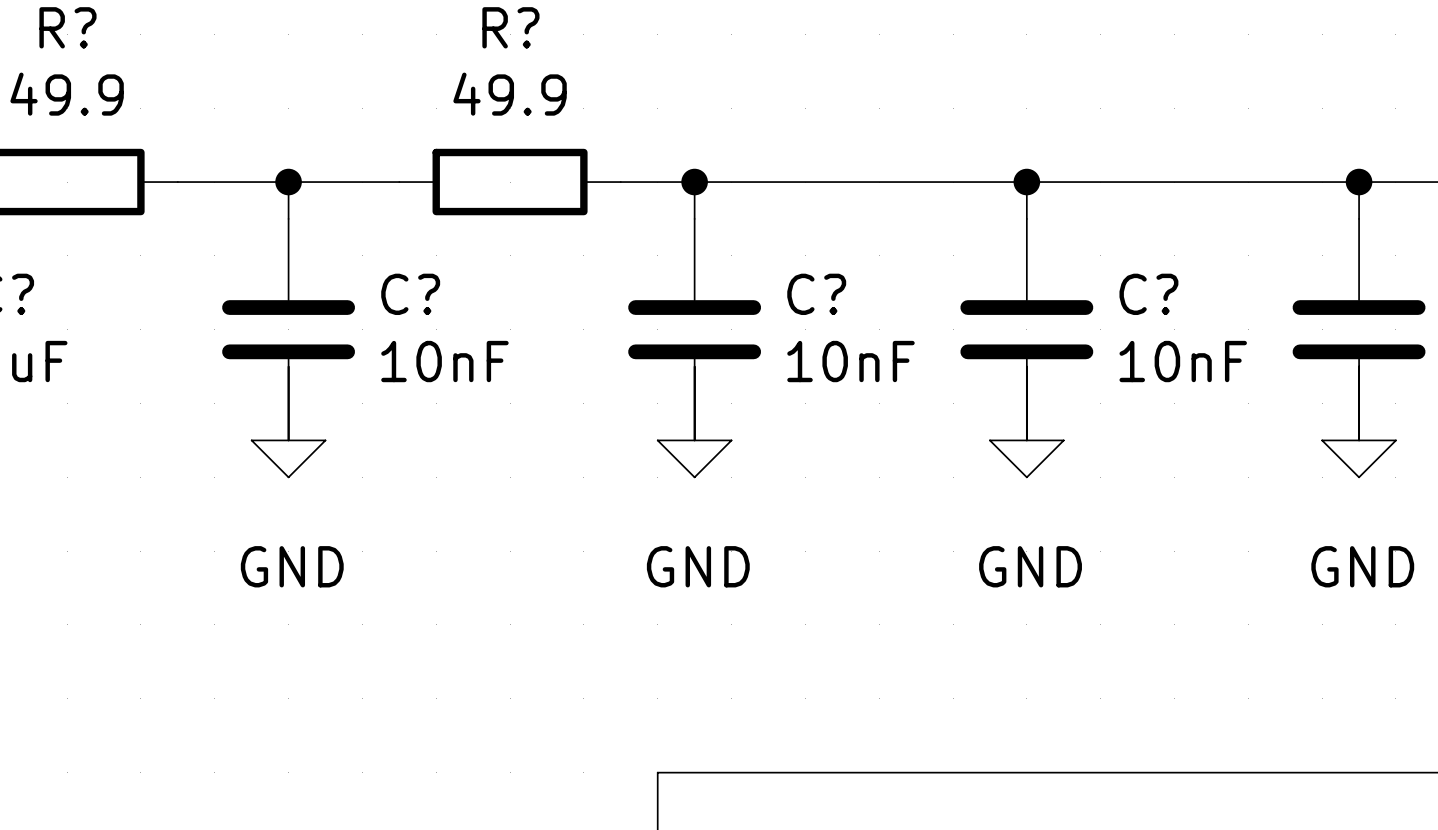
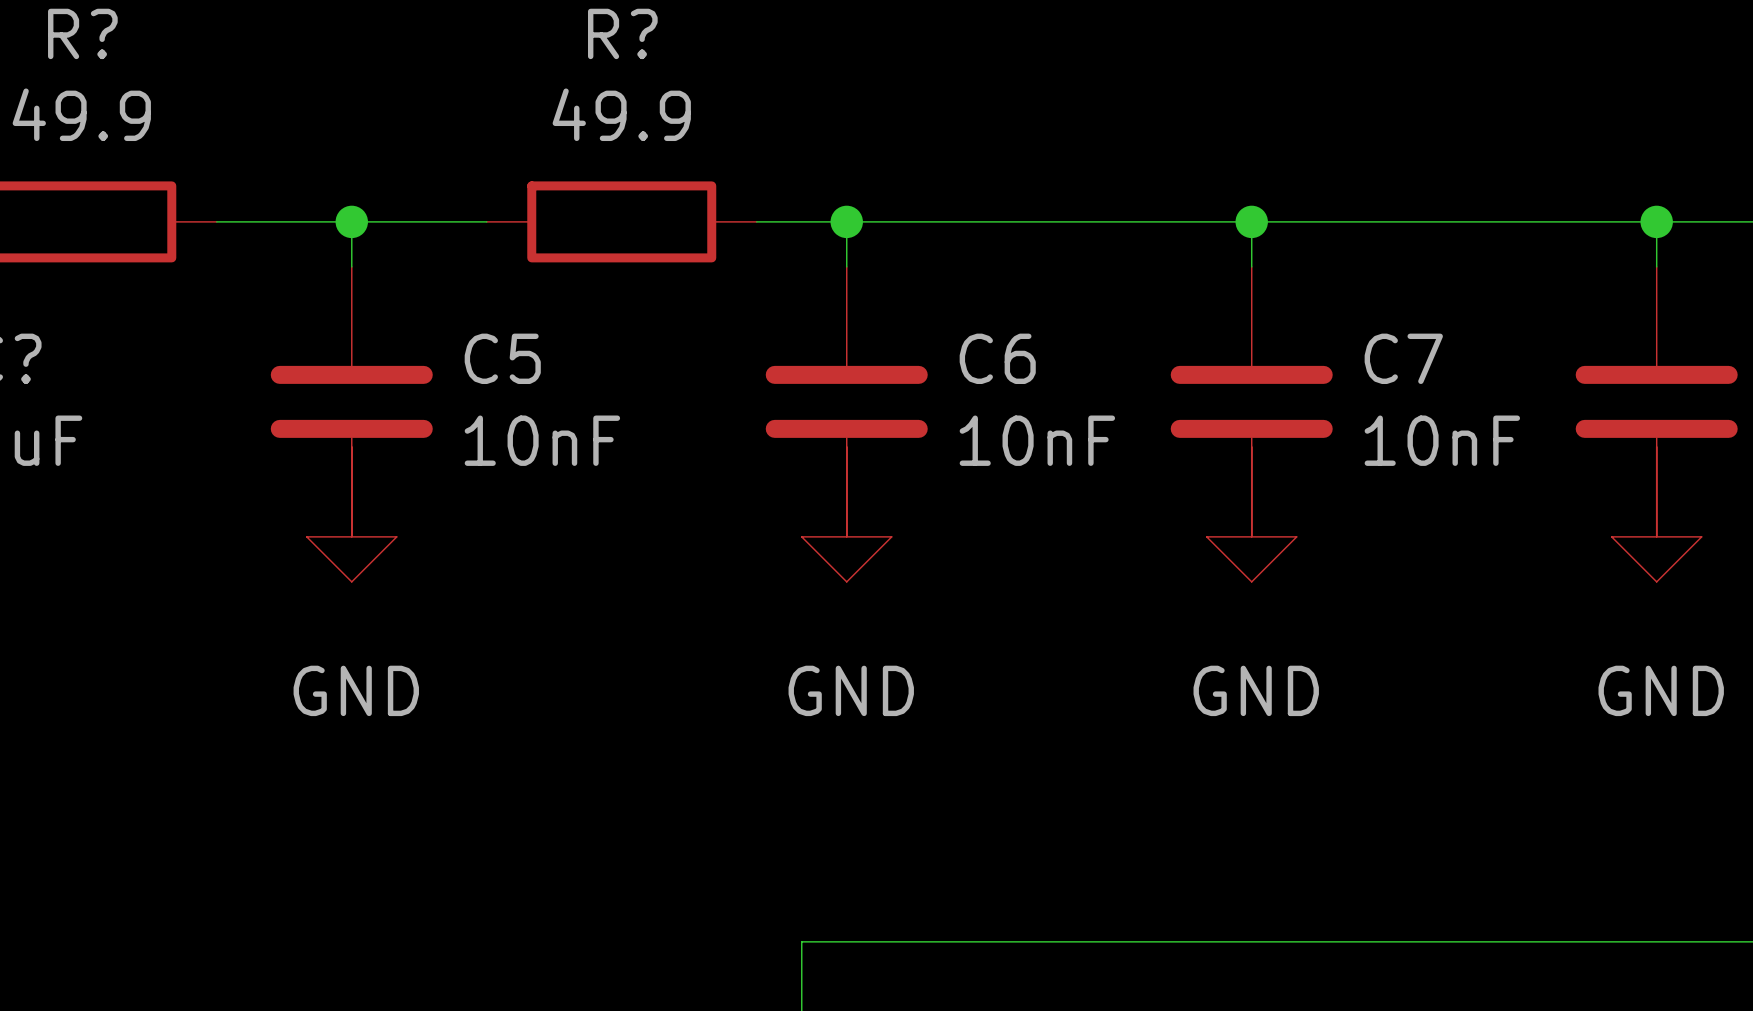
C? name: C? (410, 294) -> C5 (502, 358)
C? name: C? (816, 294) -> C6 (997, 358)
C? name: C? (1148, 294) -> C7 (1403, 358)

